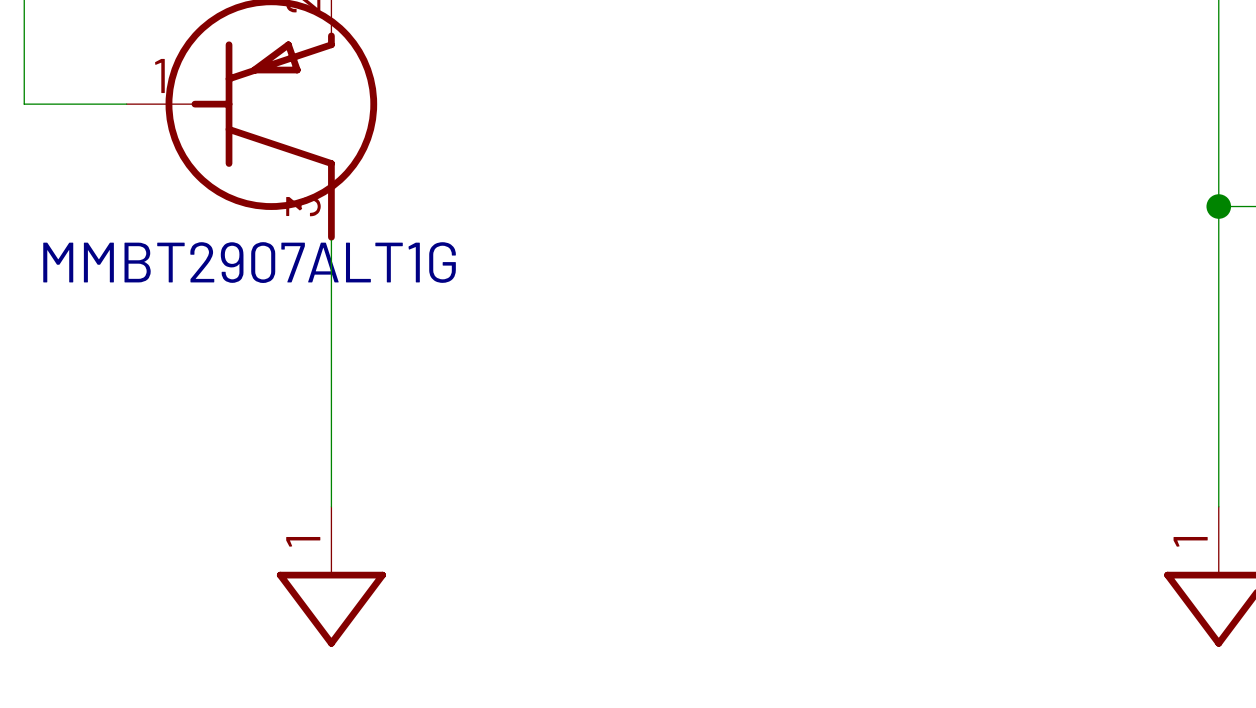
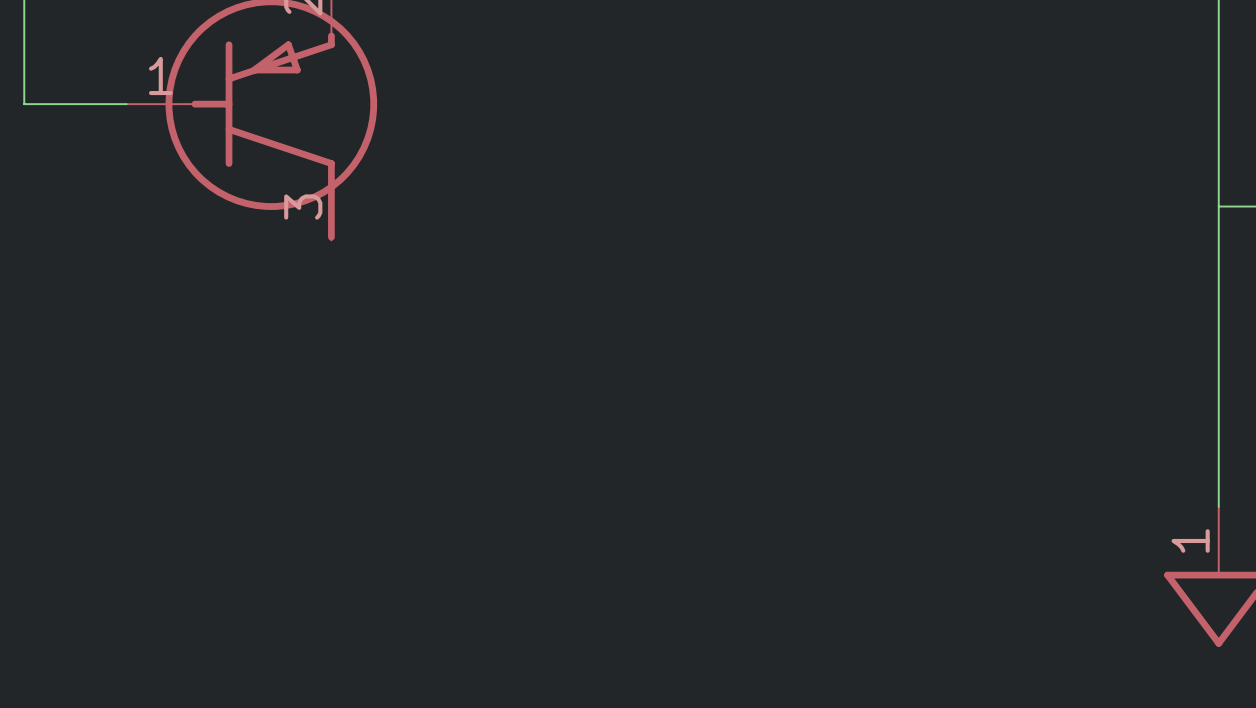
junction: (1218, 206) -> none
wire: (331, 240) (331, 506) -> none
text: MMBT2907ALT1G (249, 262) -> none
power symbol: (331, 576) -> none

